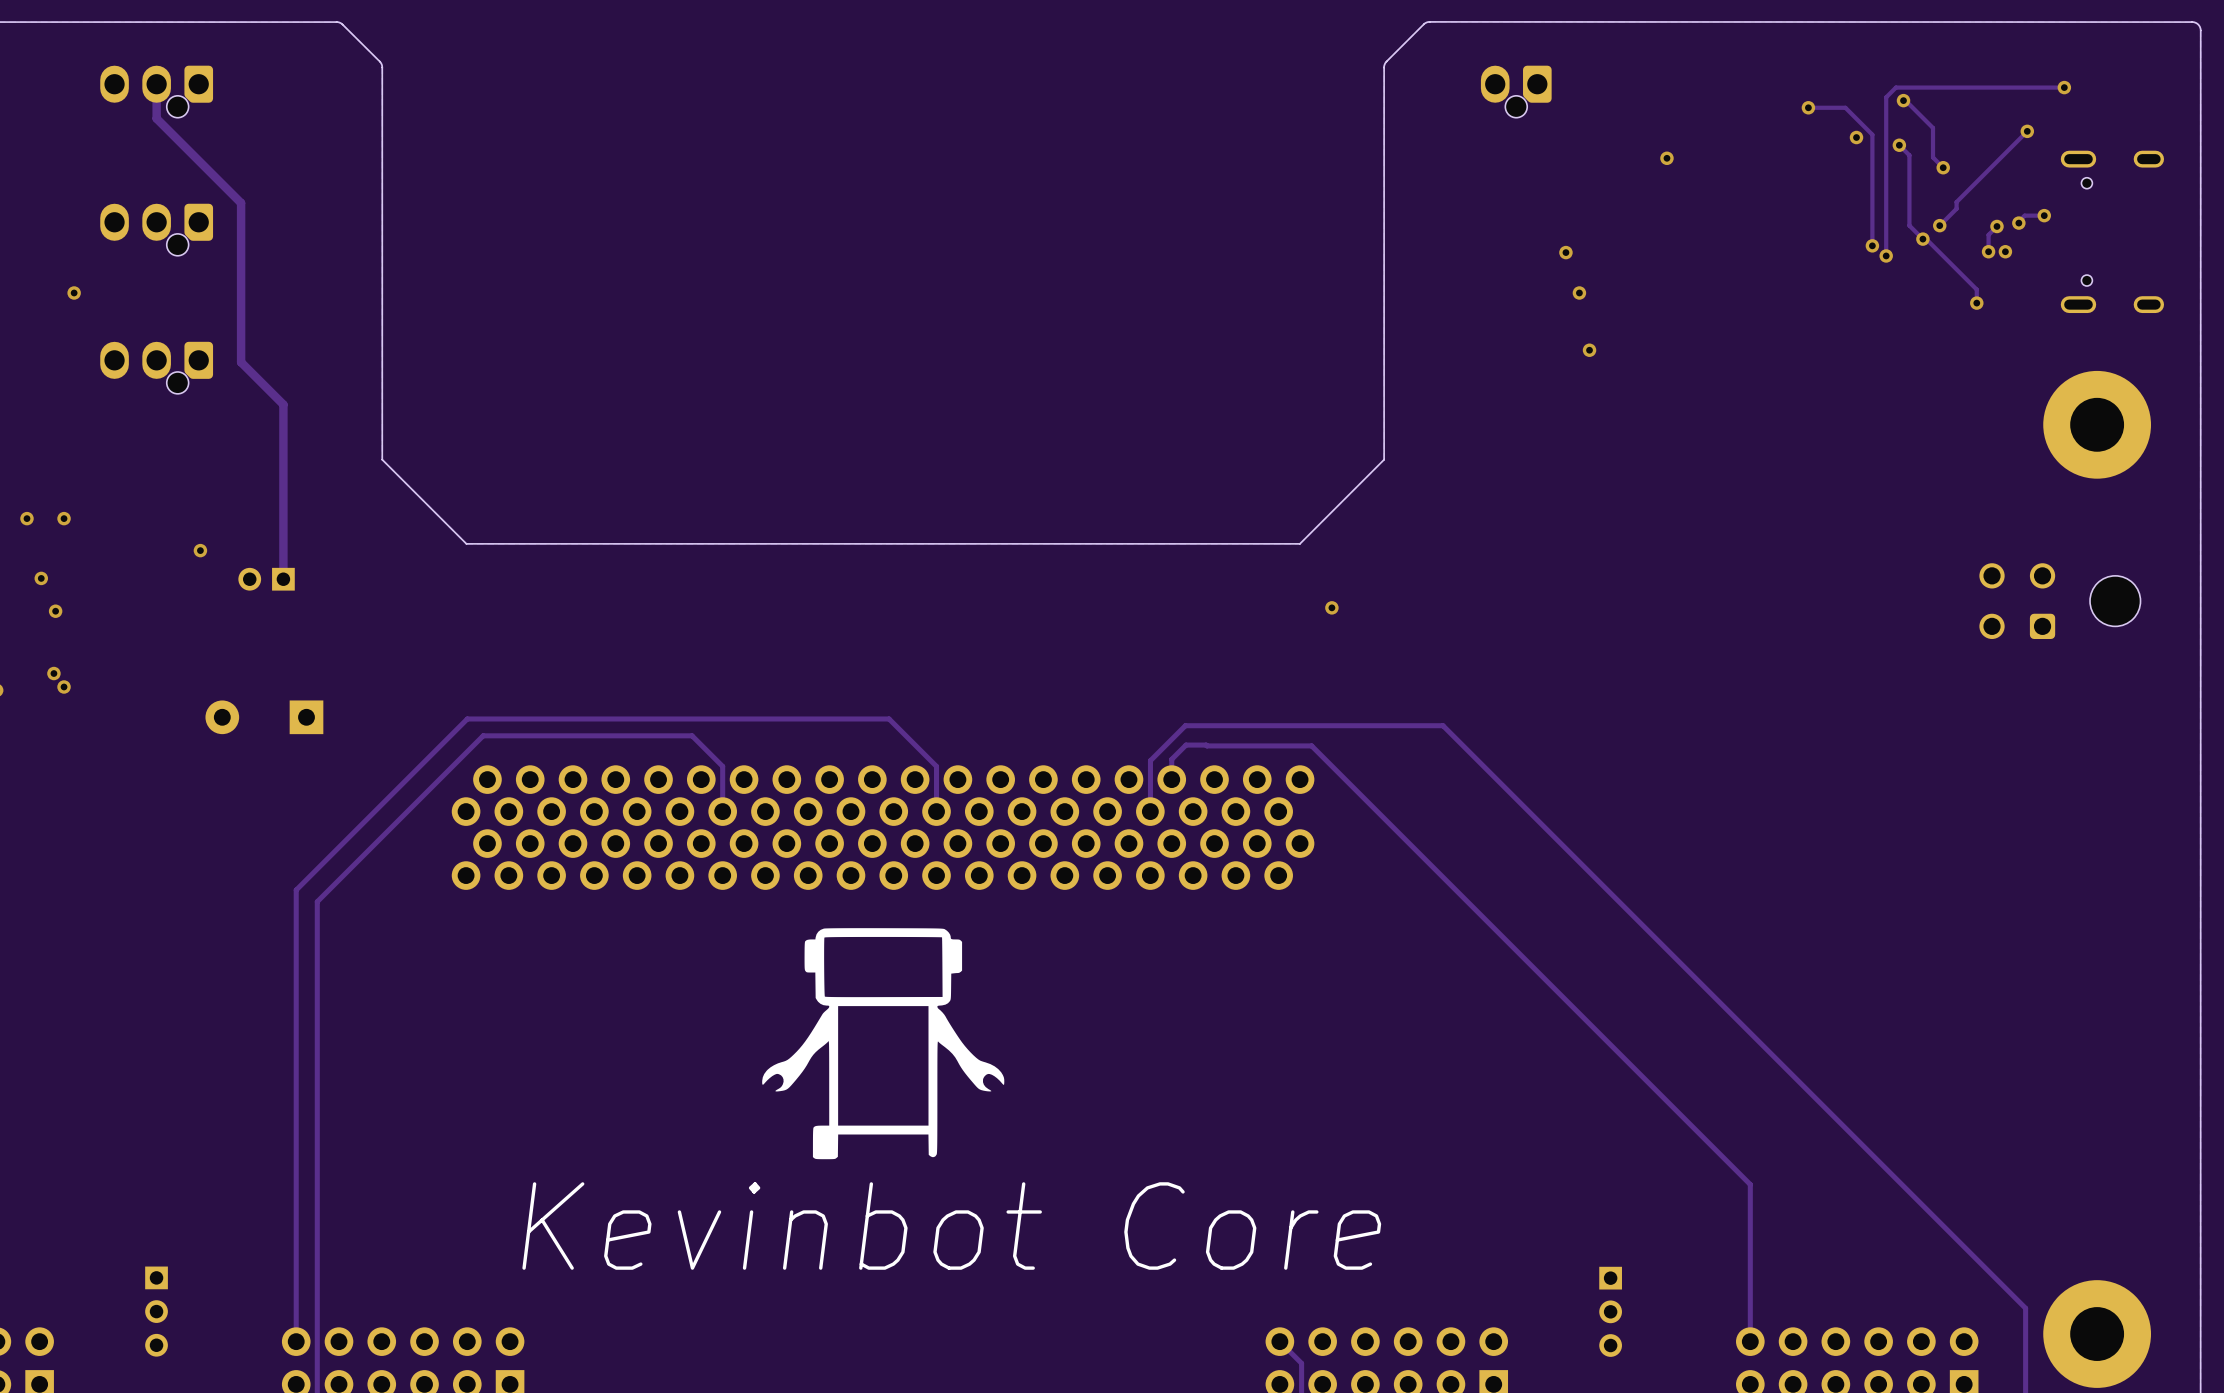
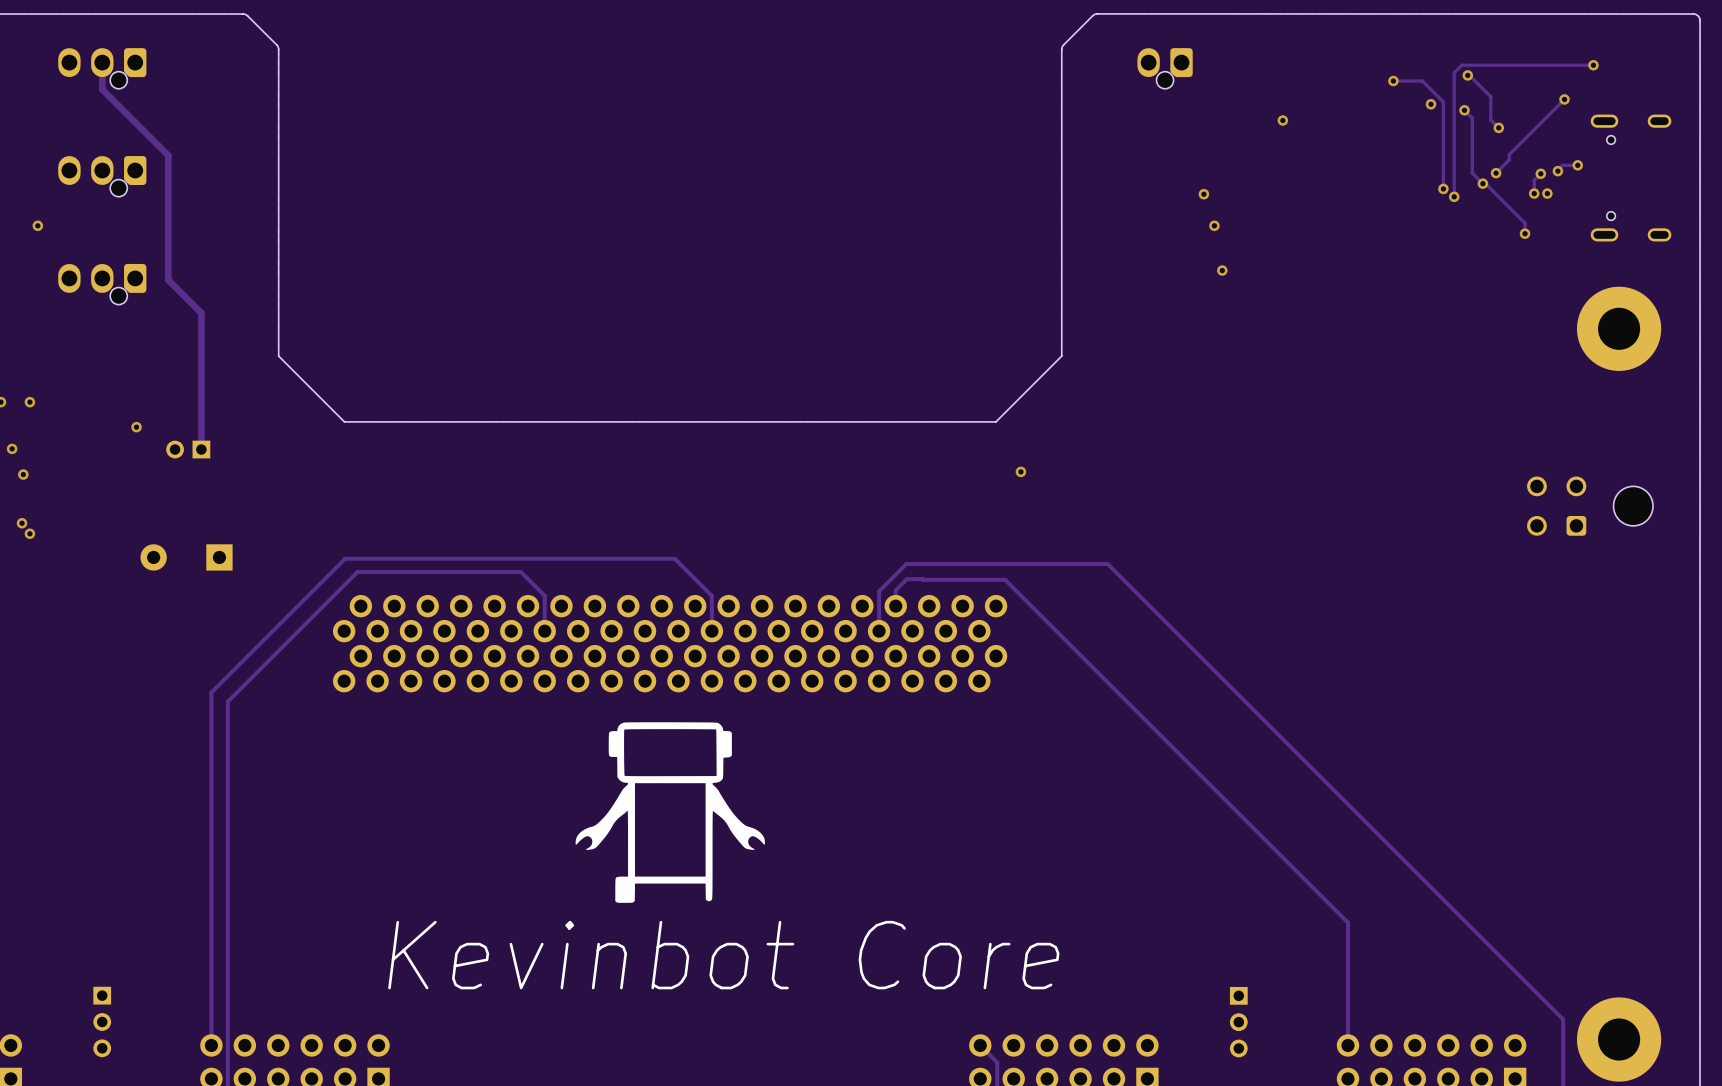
part position: (2059, 601) -> (1590, 506)

